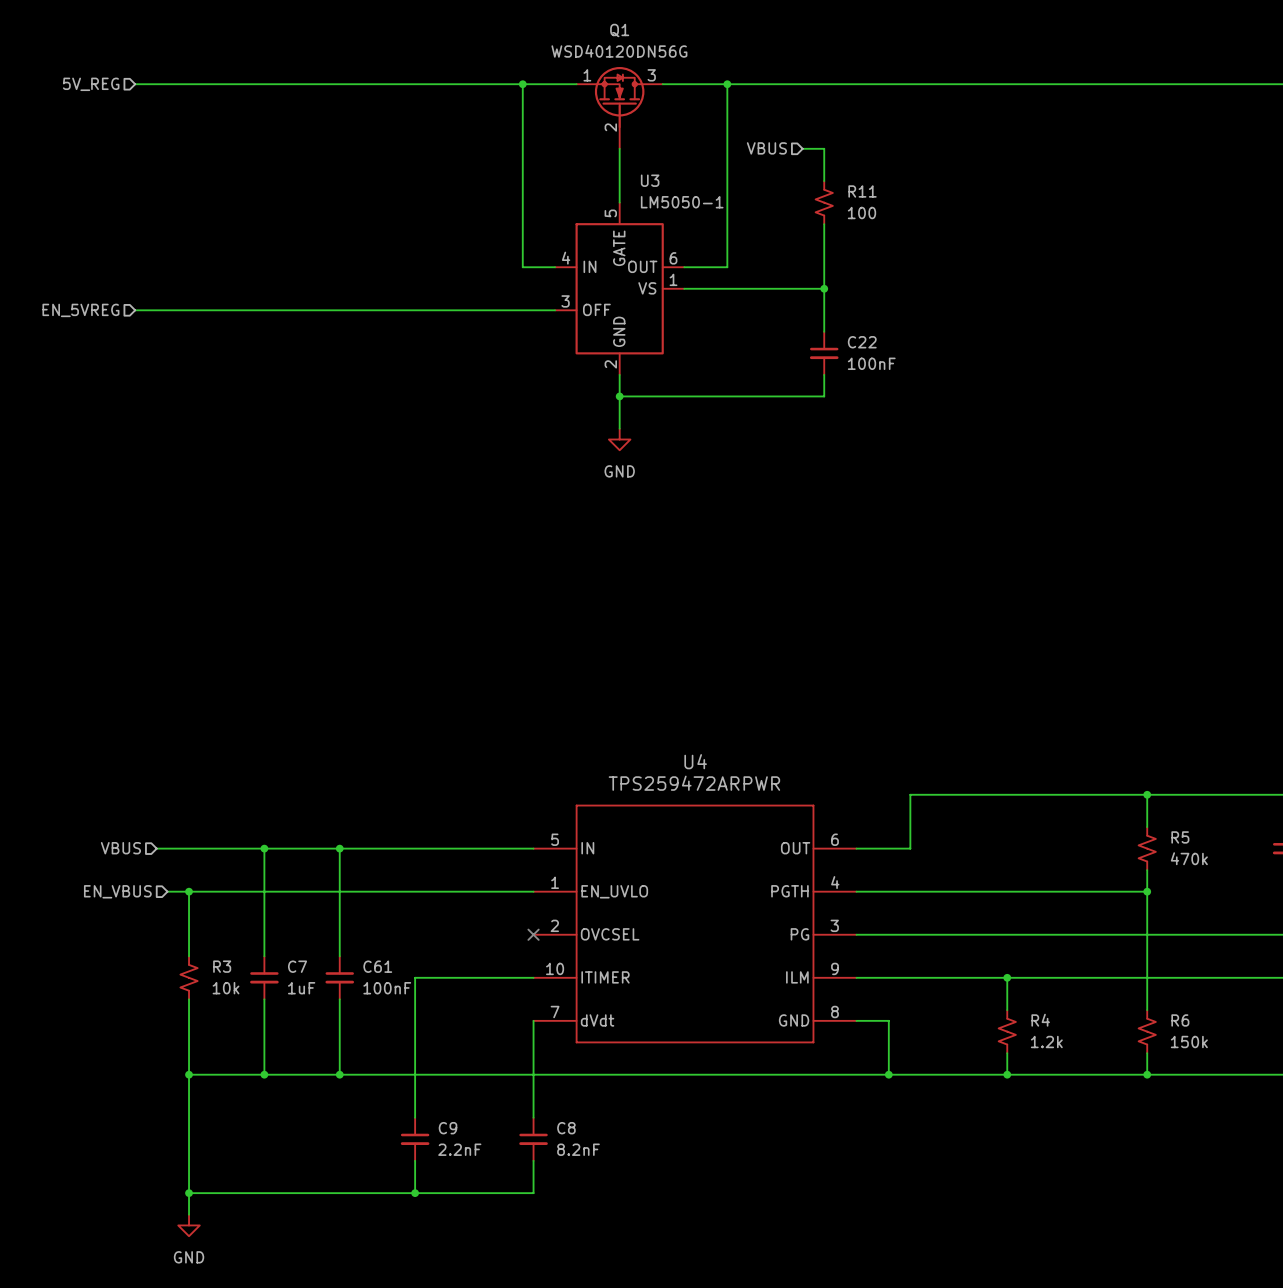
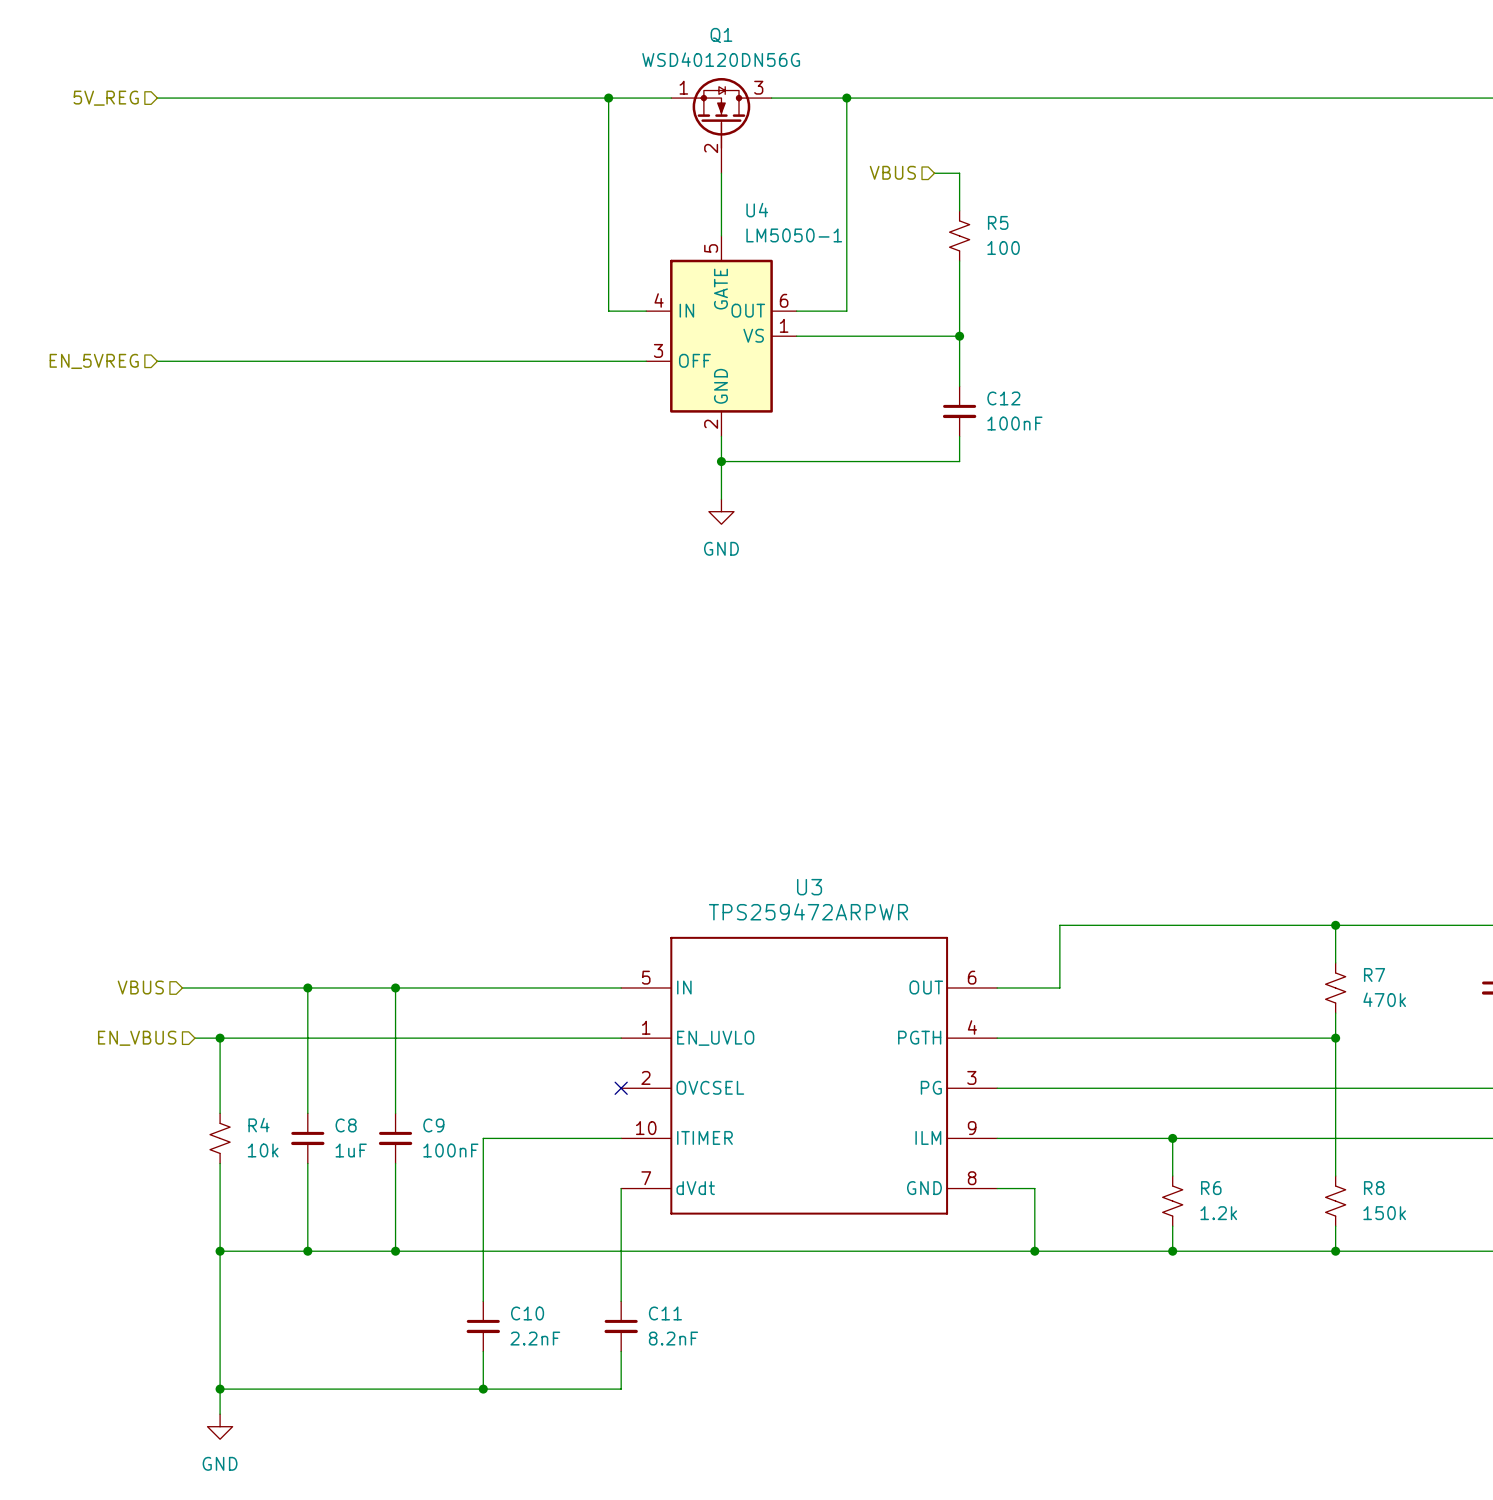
U3 name: U3 (650, 180) -> U4 (757, 210)
R11 name: R11 (862, 191) -> R5 (998, 222)
C22 name: C22 (862, 342) -> C12 (1003, 398)
U4 name: U4 (695, 761) -> U3 (809, 887)
R5 name: R5 (1180, 837) -> R7 (1374, 974)
R3 name: R3 (222, 966) -> R4 (258, 1125)
C7 name: C7 (297, 966) -> C8 (346, 1125)
C61 name: C61 (377, 966) -> C9 (433, 1125)
R4 name: R4 (1040, 1020) -> R6 (1211, 1188)
R6 name: R6 (1180, 1020) -> R8 (1374, 1188)
C9 name: C9 (448, 1128) -> C10 (527, 1313)
C8 name: C8 (566, 1128) -> C11 (665, 1313)

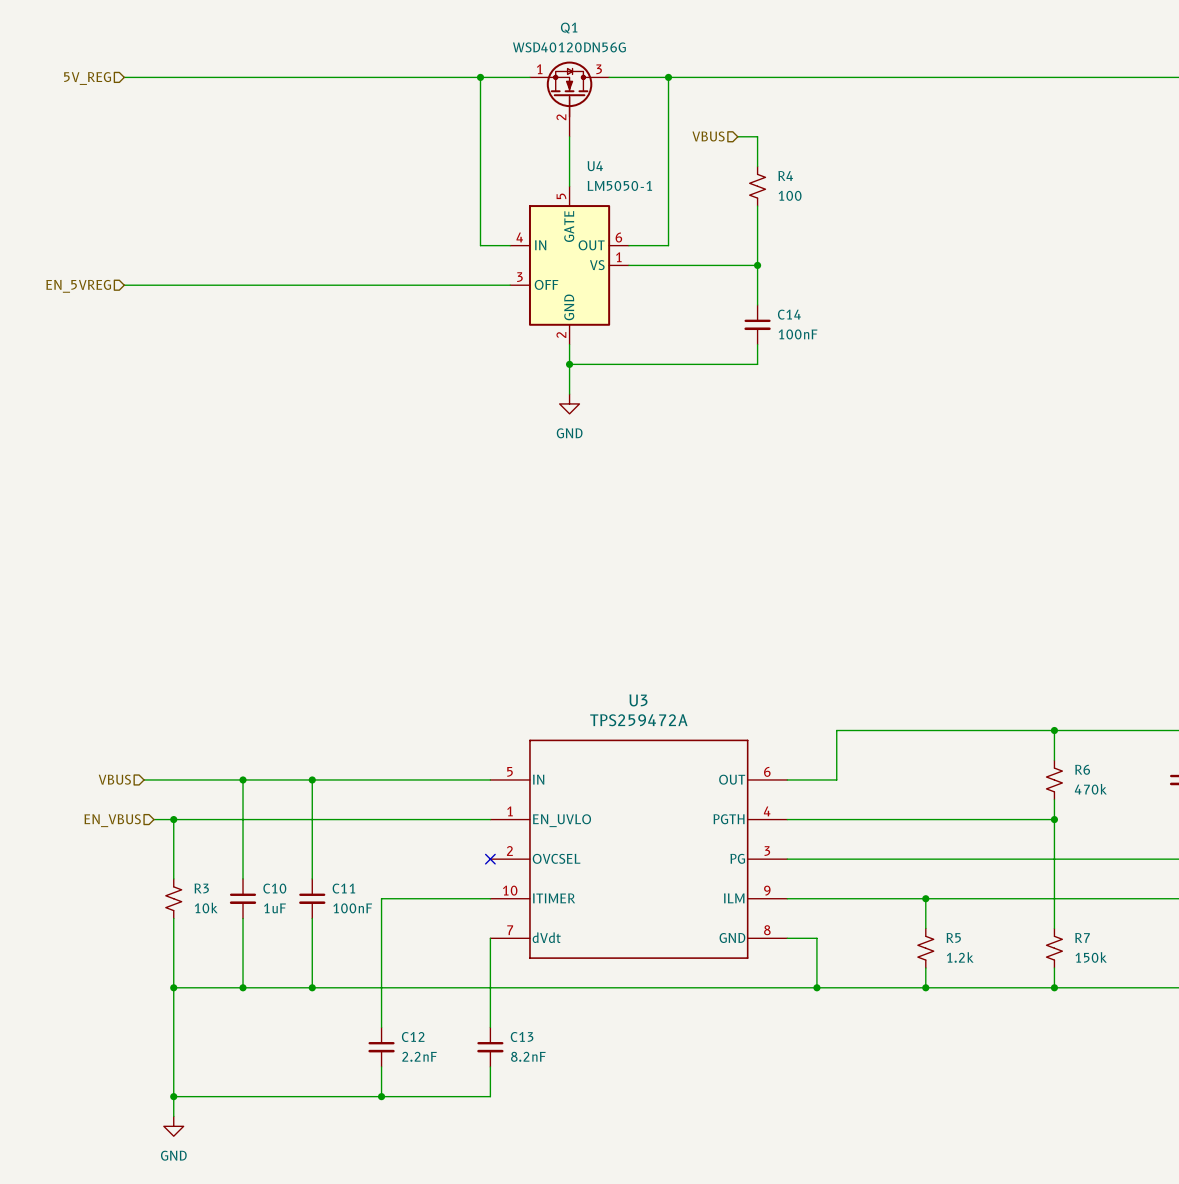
R5 name: R5 (998, 222) -> R4 (785, 175)
C12 name: C12 (1003, 398) -> C14 (789, 314)
U3 value: TPS259472ARPWR (808, 911) -> TPS259472A (638, 720)
R7 name: R7 (1374, 974) -> R6 (1082, 769)
R4 name: R4 (258, 1125) -> R3 (201, 888)
C8 name: C8 (346, 1125) -> C10 (274, 888)
C9 name: C9 (433, 1125) -> C11 (343, 888)
R6 name: R6 (1211, 1188) -> R5 (953, 937)
R8 name: R8 (1374, 1188) -> R7 (1082, 937)
C10 name: C10 (527, 1313) -> C12 (413, 1037)
C11 name: C11 (665, 1313) -> C13 (522, 1037)

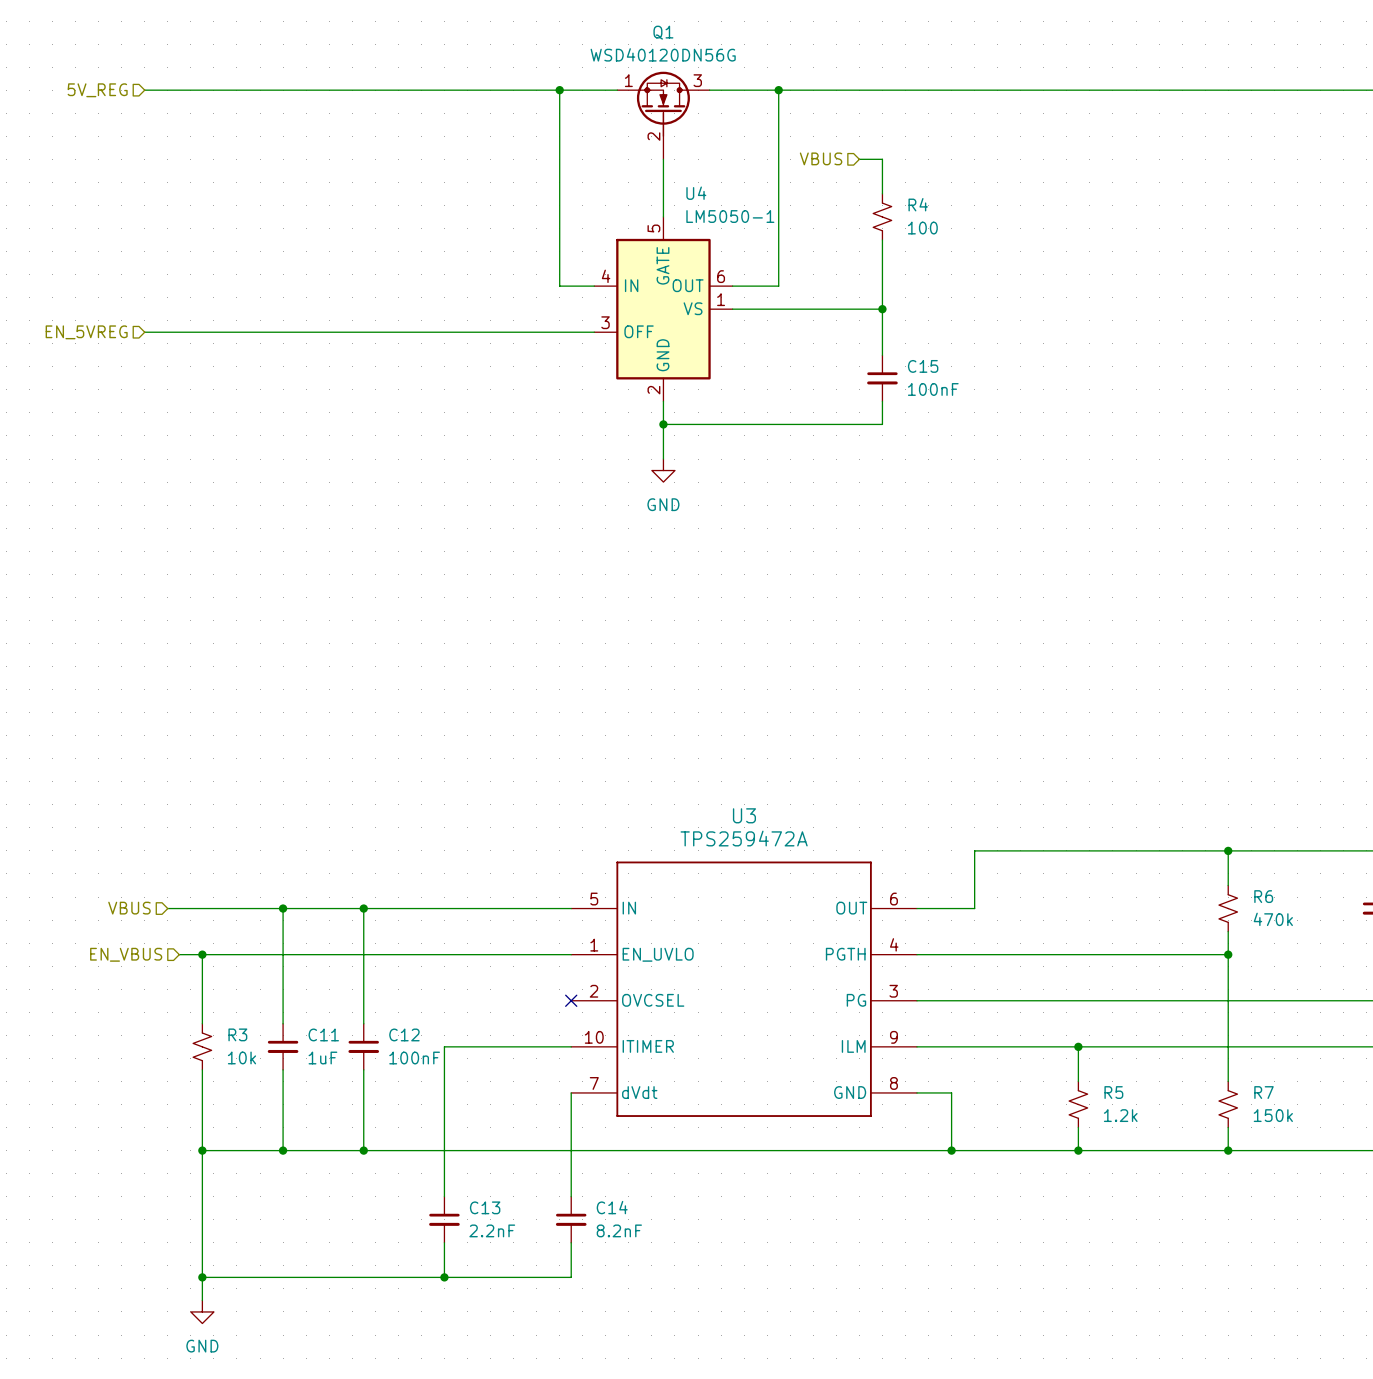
C14 name: C14 (789, 314) -> C15 (923, 366)
C10 name: C10 (274, 888) -> C11 (323, 1034)
C11 name: C11 (343, 888) -> C12 (404, 1034)
C12 name: C12 (413, 1037) -> C13 (485, 1207)
C13 name: C13 (522, 1037) -> C14 (612, 1207)

